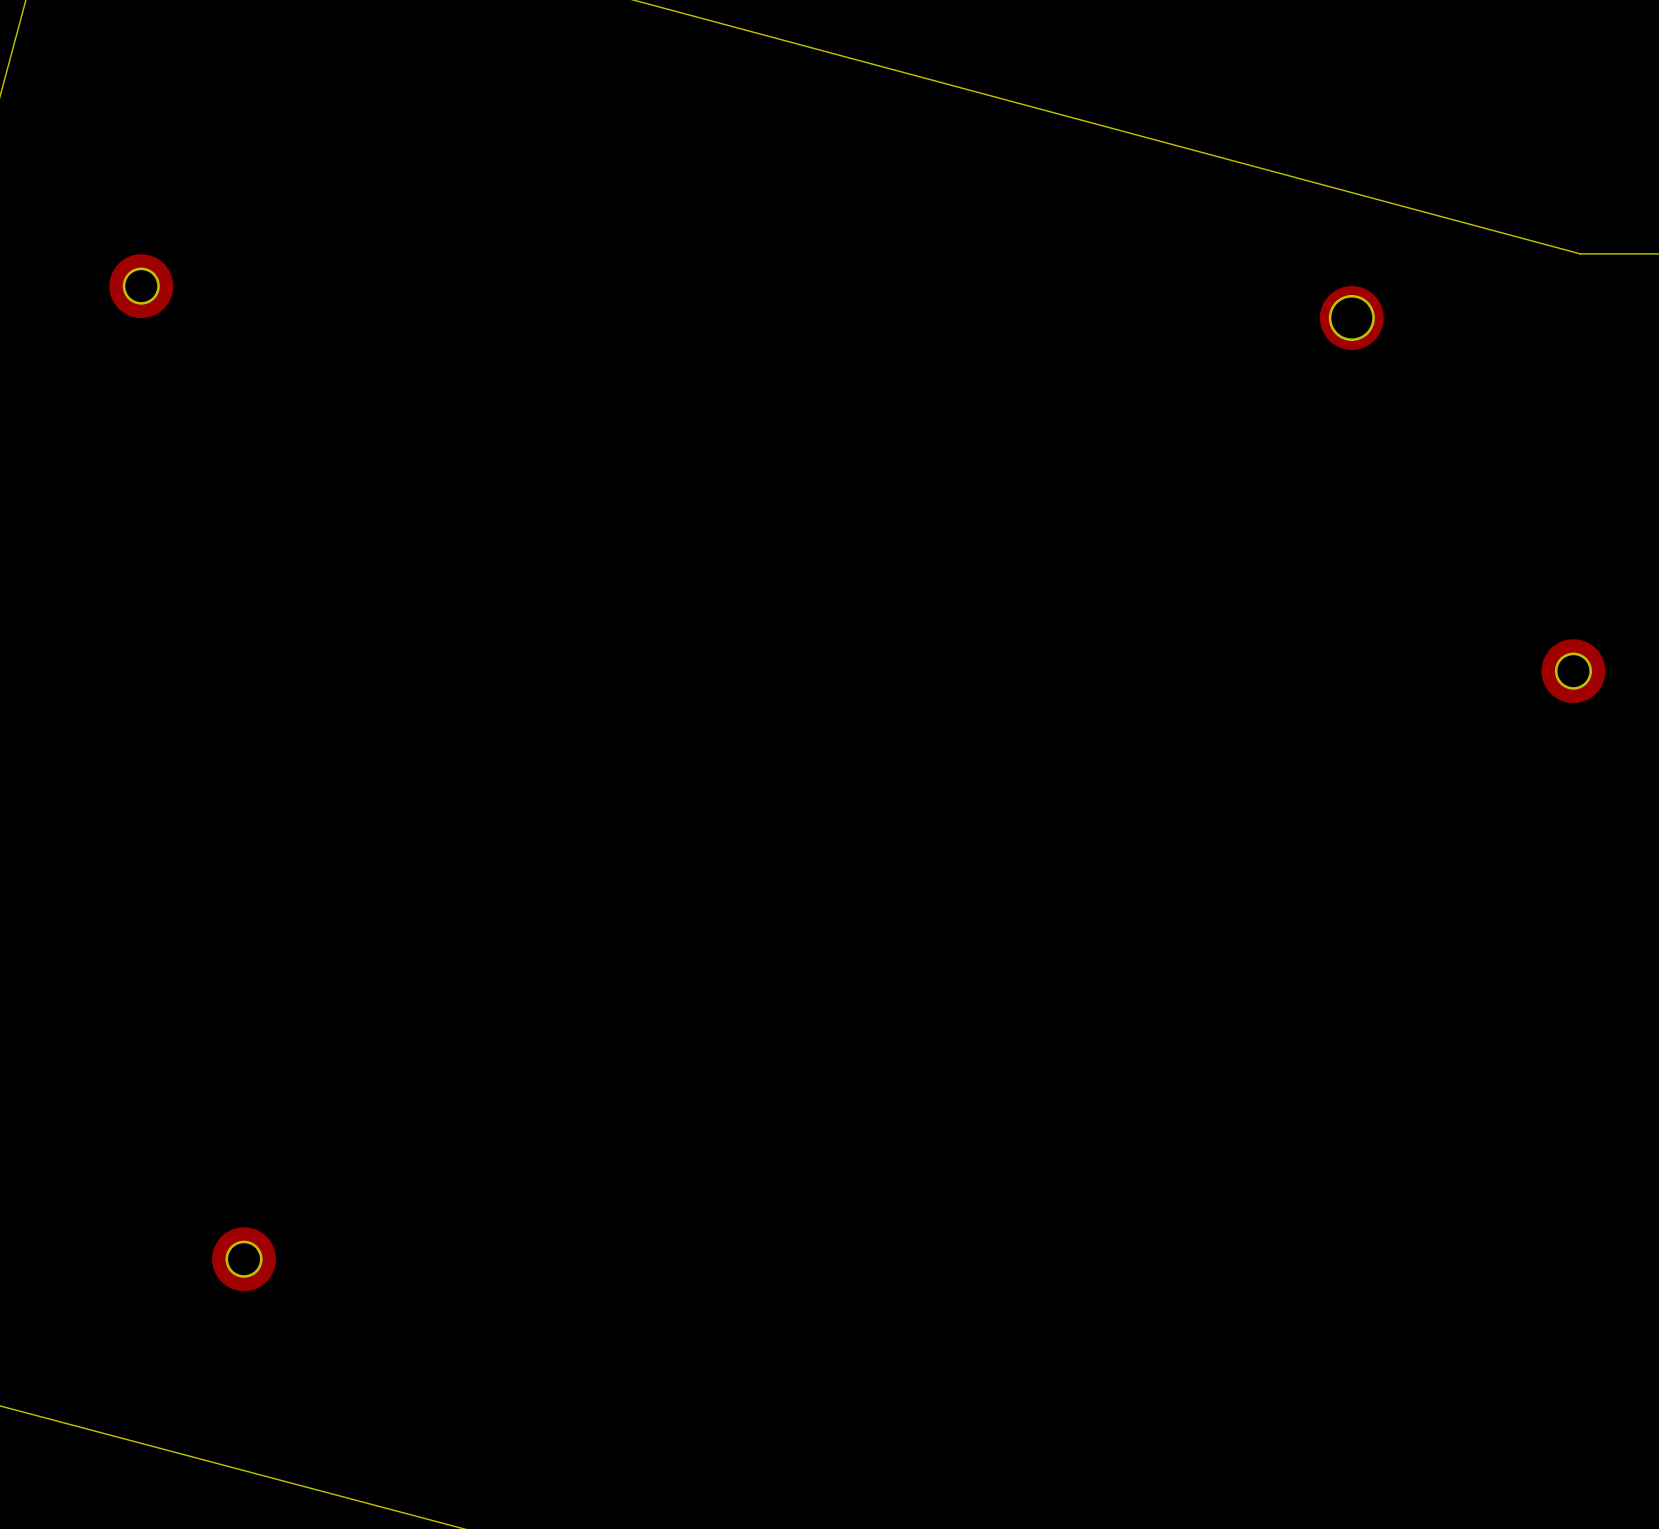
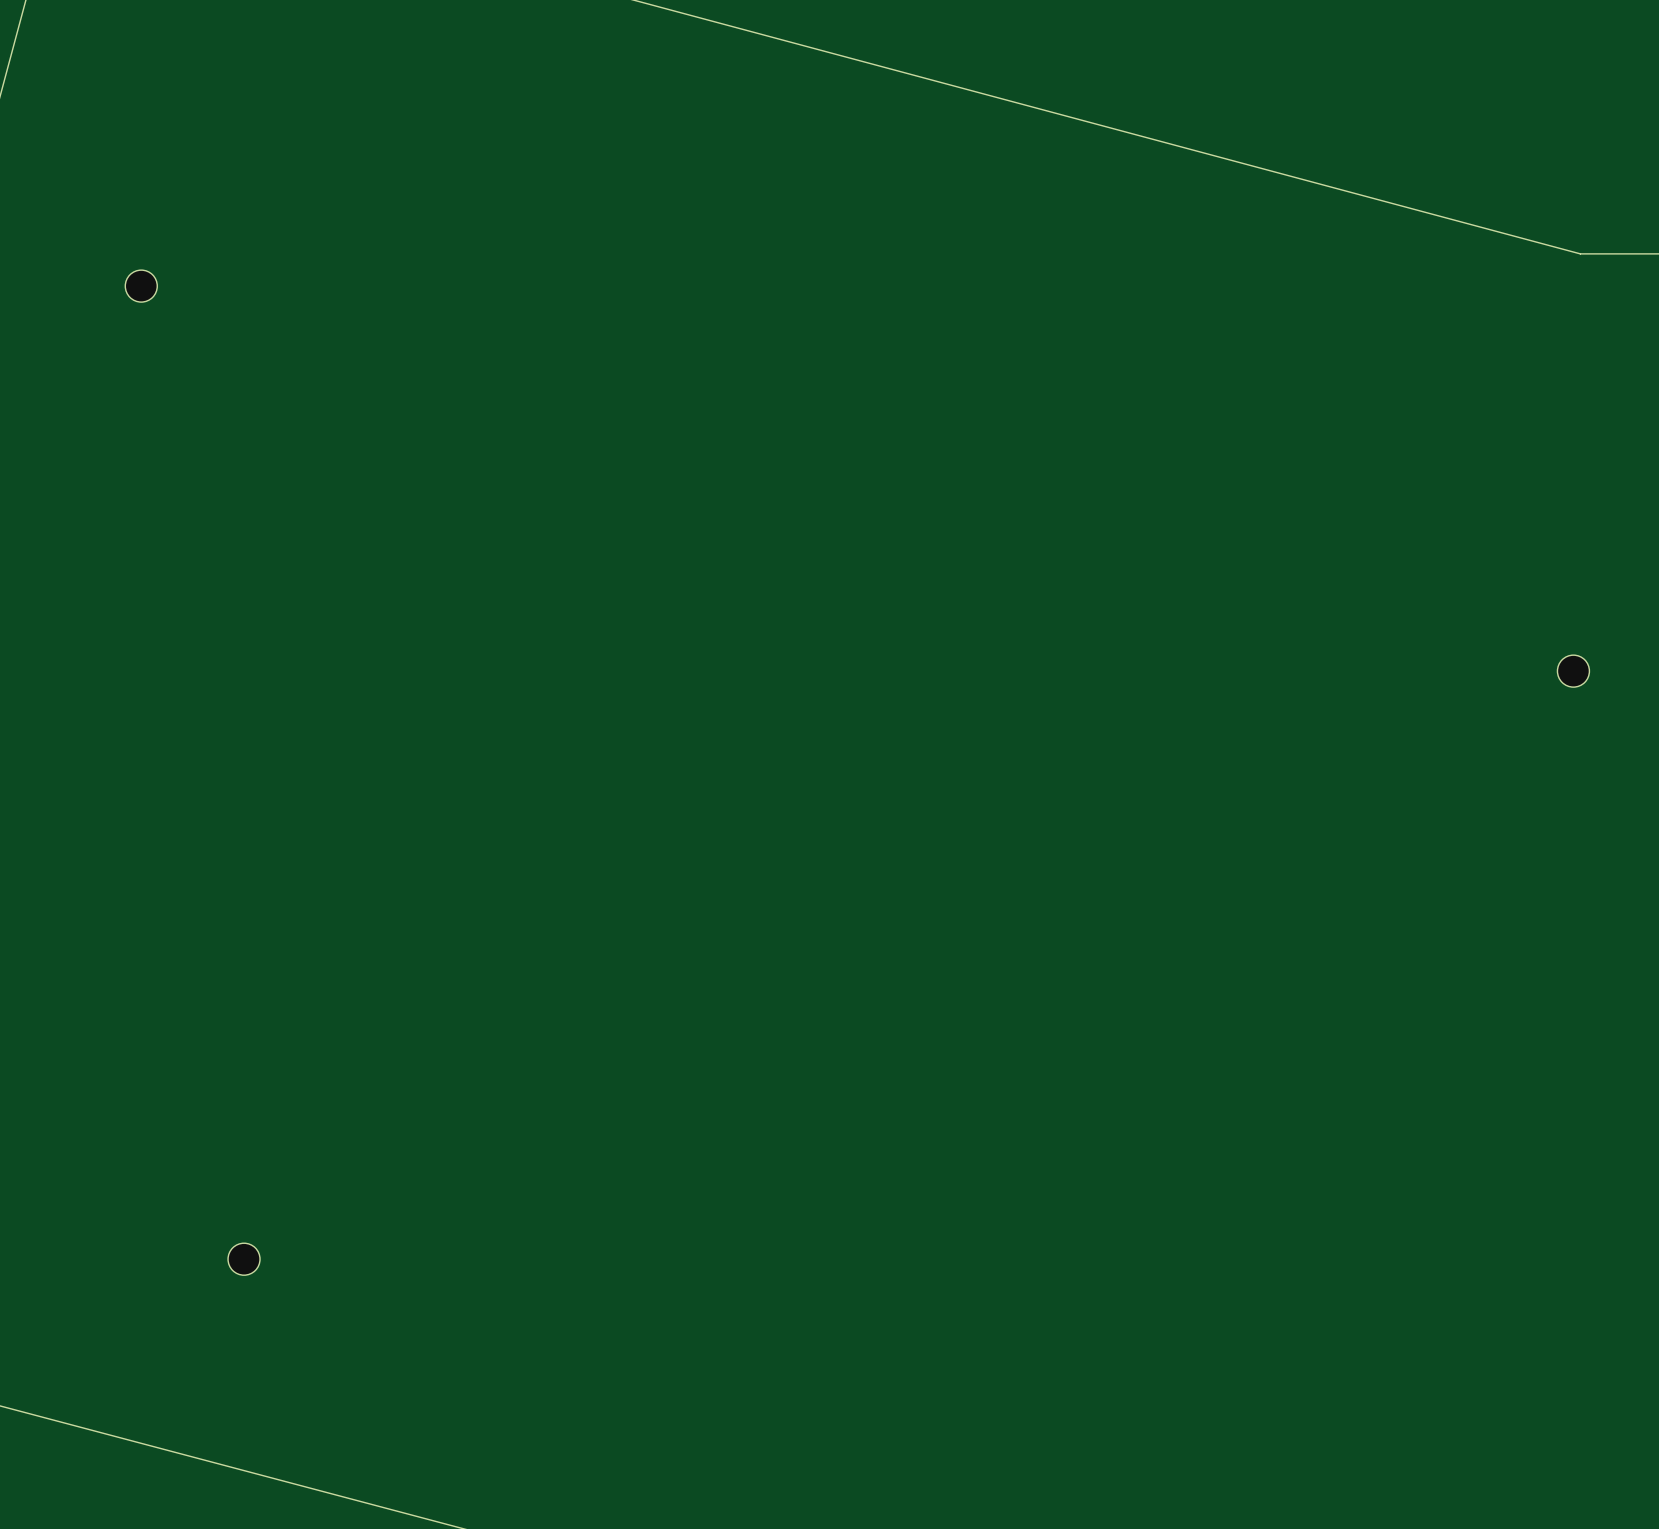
part footprint: [109, 254, 174, 319] -> [125, 270, 158, 303]
part: (1351, 317) -> none
part footprint: [1541, 639, 1606, 704] -> [1557, 655, 1590, 688]
part footprint: [212, 1227, 276, 1292] -> [228, 1243, 261, 1276]

